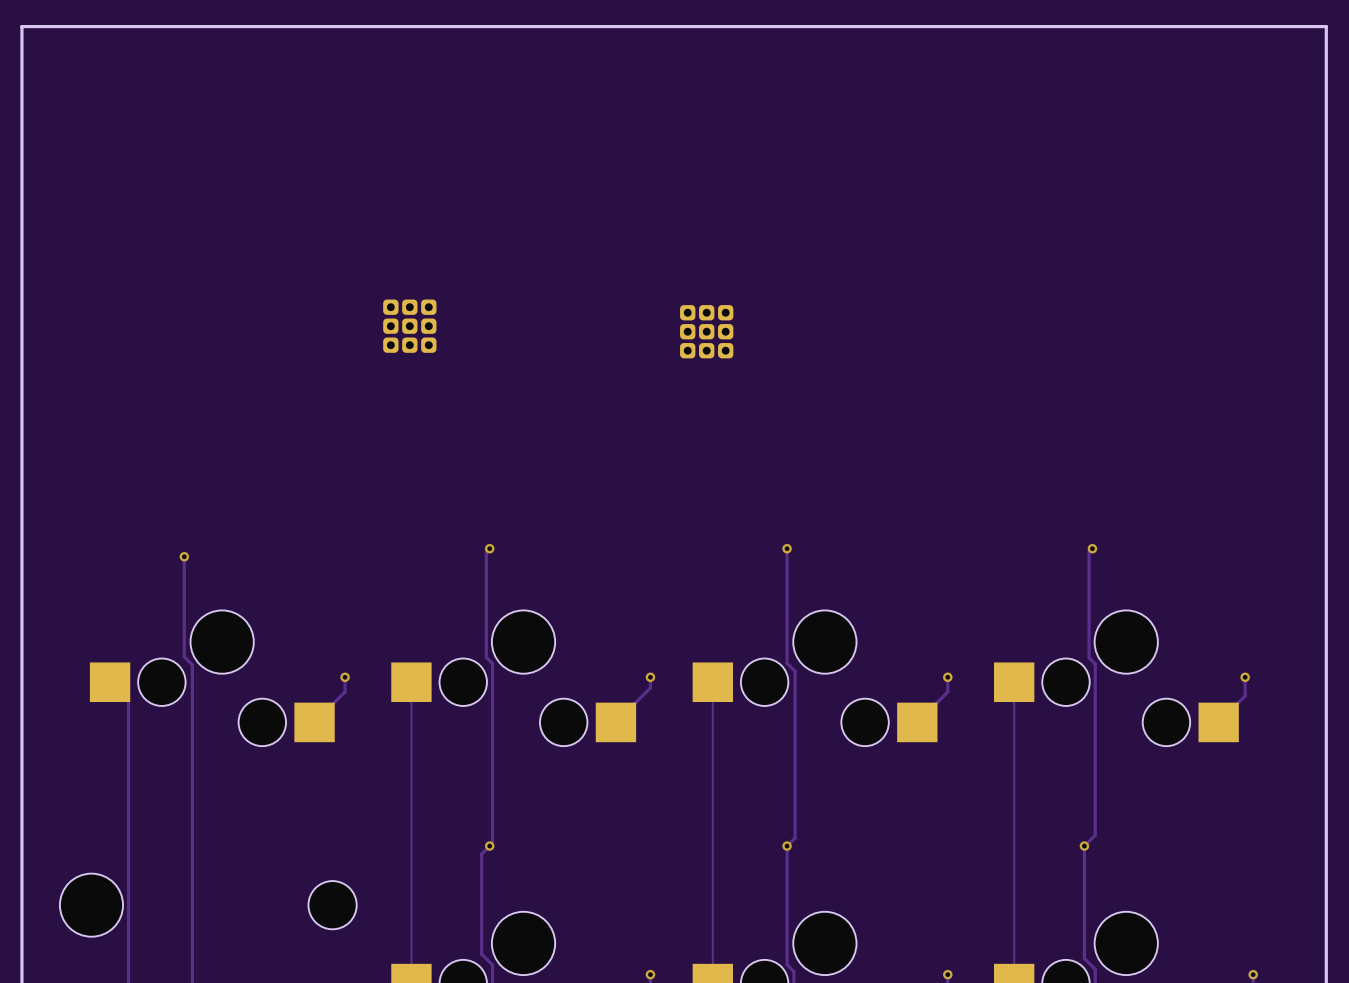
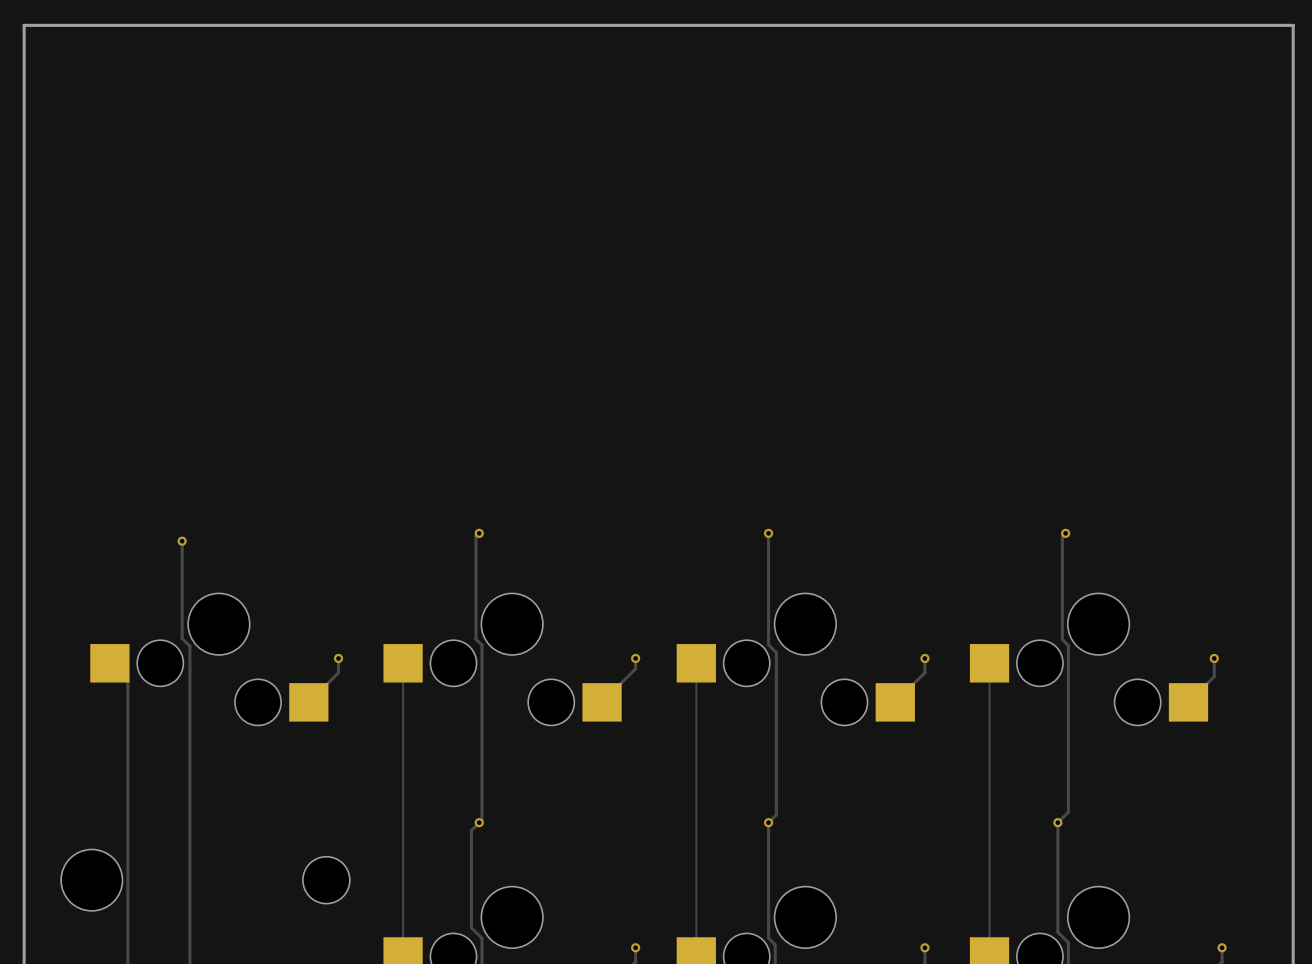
part: (409, 326) -> none
part: (706, 331) -> none

